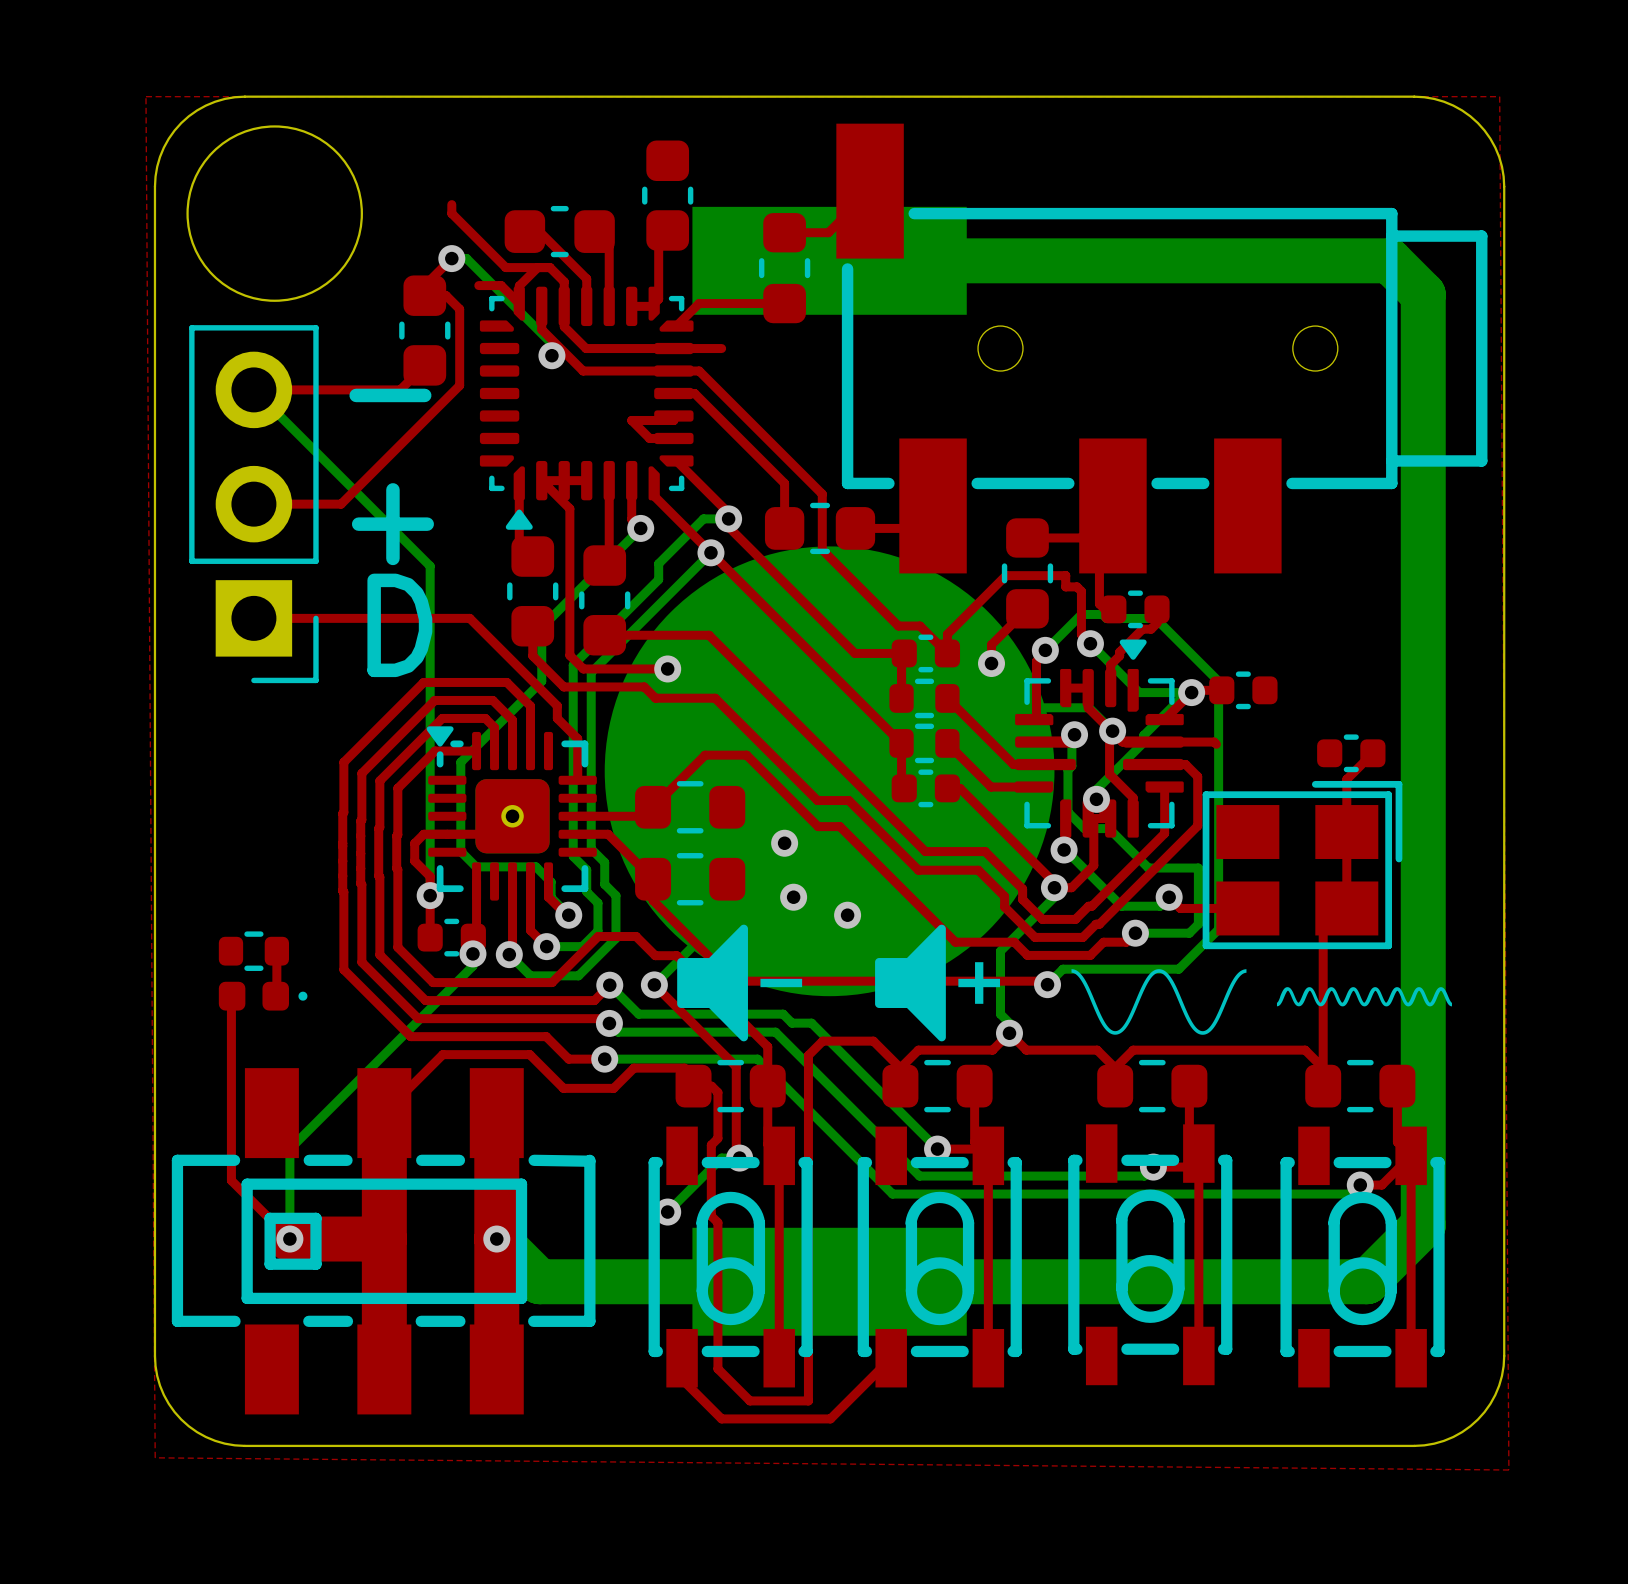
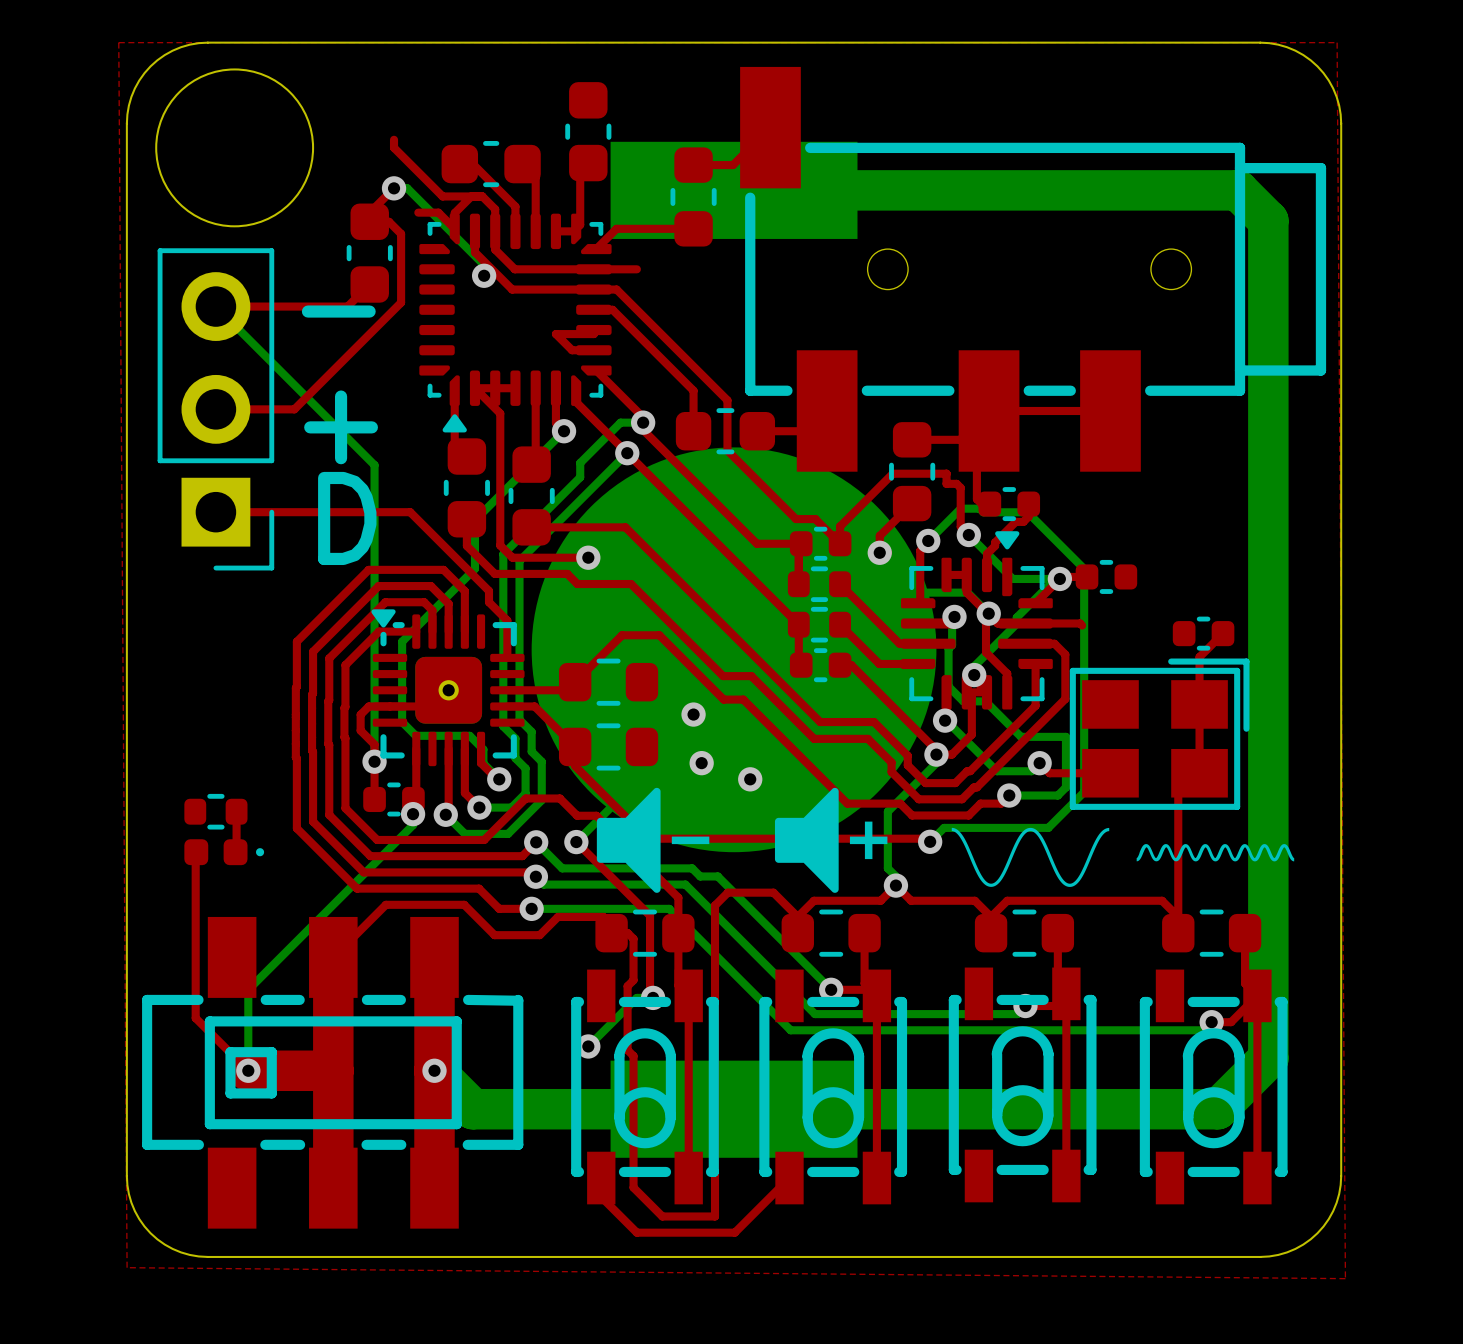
top track: none -> (989, 410) (1110, 410)

